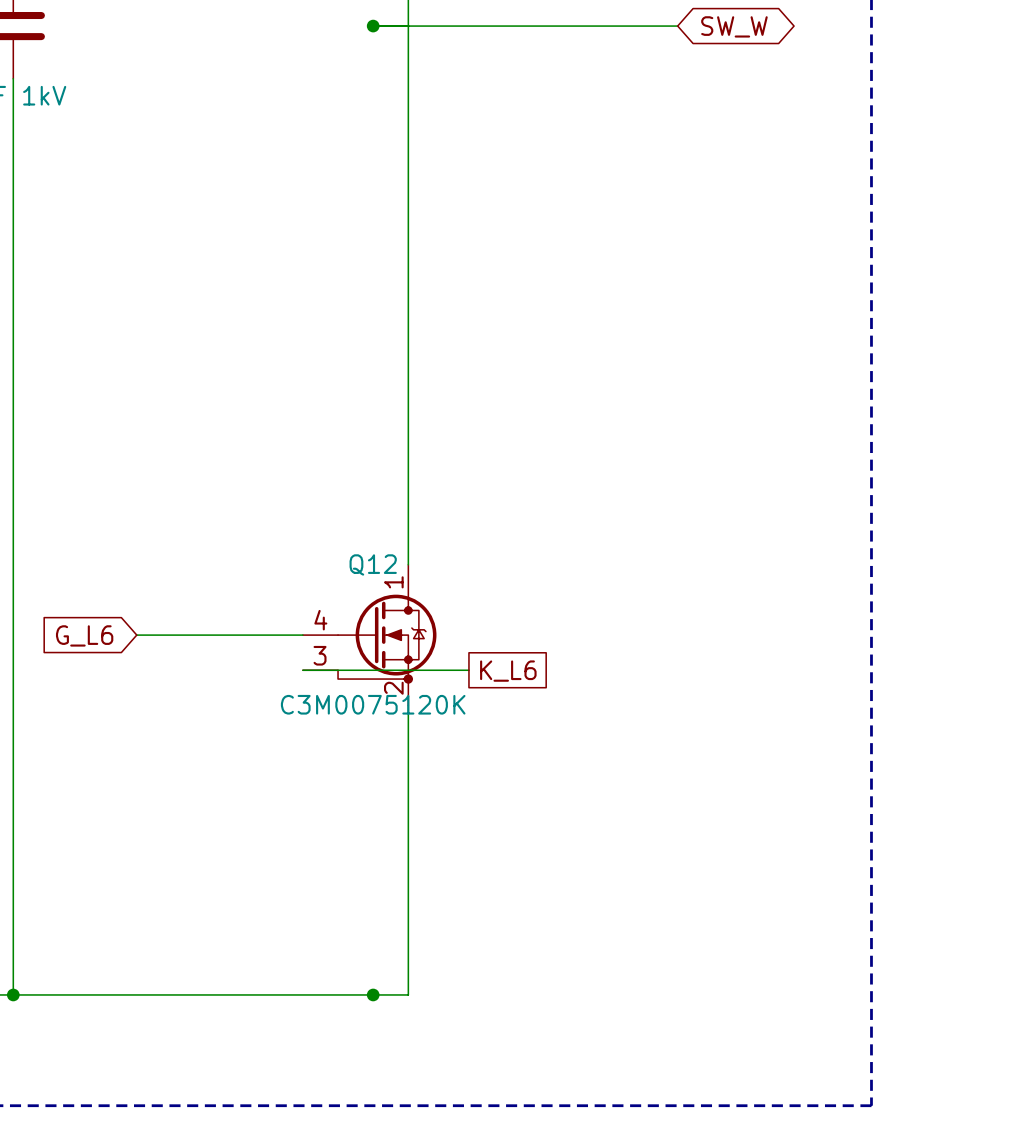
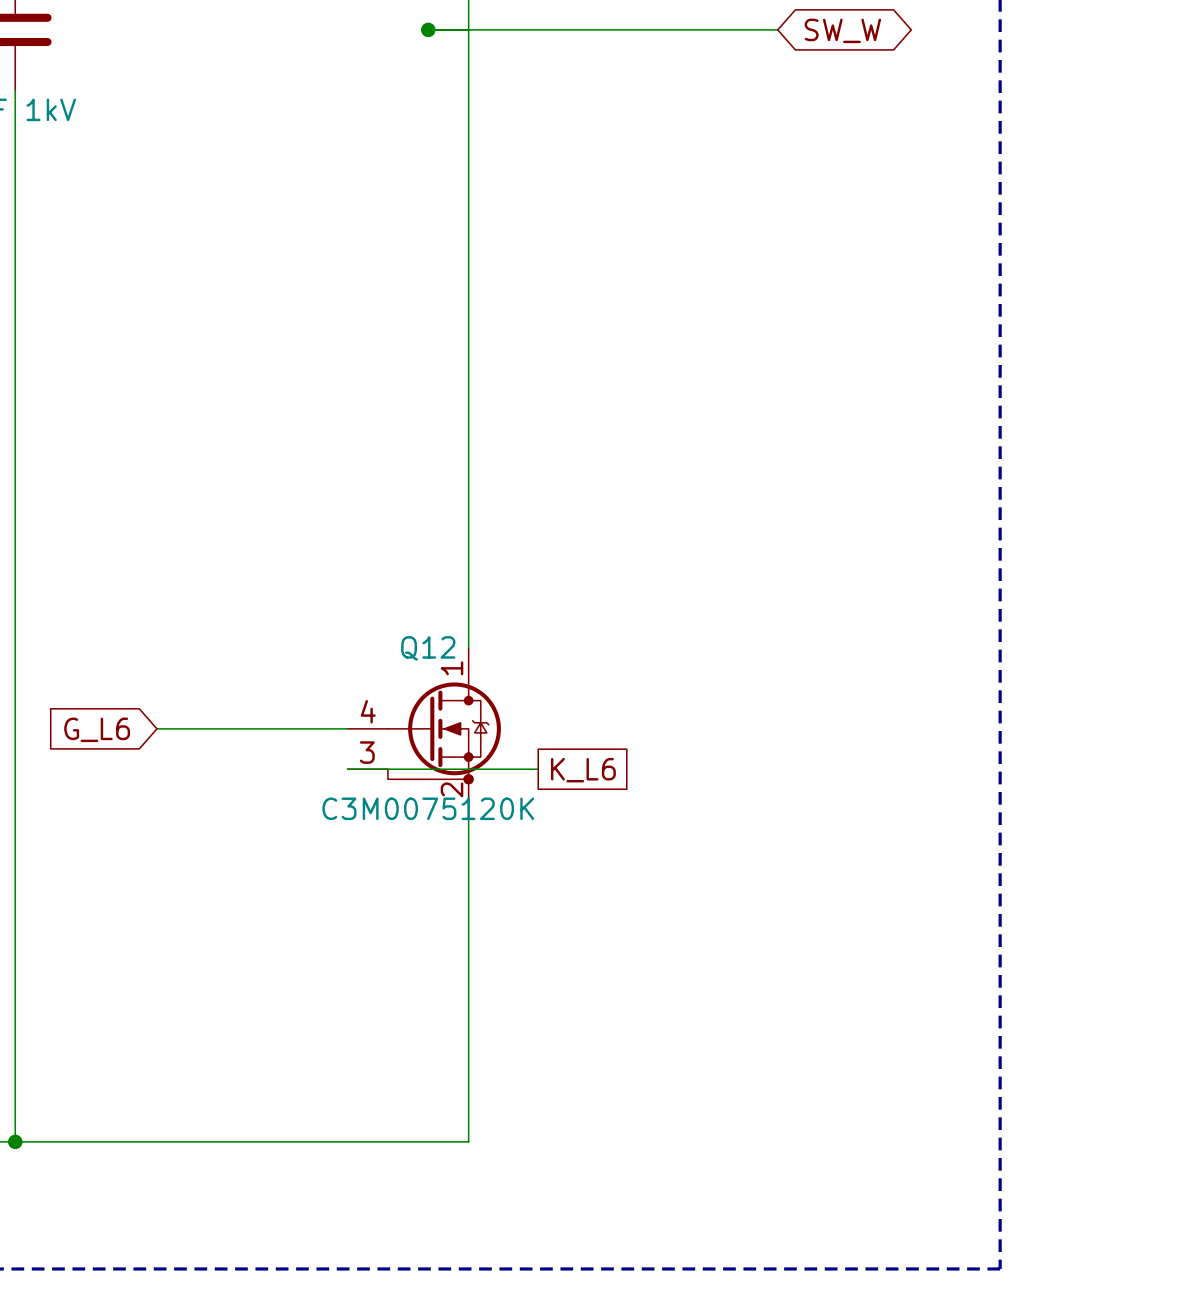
junction: (373, 994) -> none

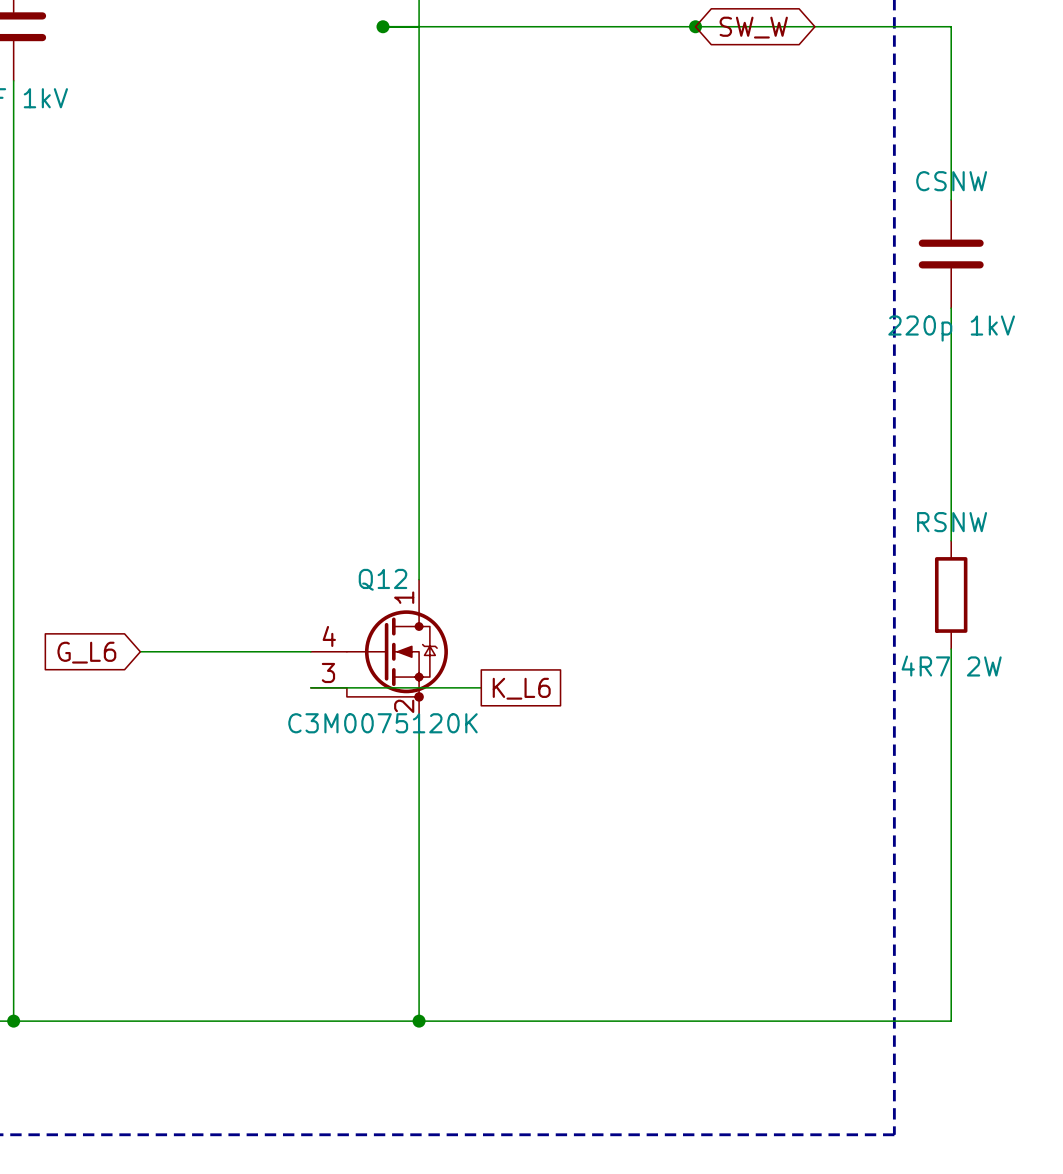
wire: none -> (695, 26) (951, 26) (951, 199)
junction: none -> (695, 26)
CSNW: none -> 220p 1kV (951, 254)
wire: none -> (951, 308) (951, 540)
RSNW: none -> 4R7 2W (951, 594)
wire: none -> (951, 649) (951, 1021) (419, 1021)
junction: none -> (419, 1021)

